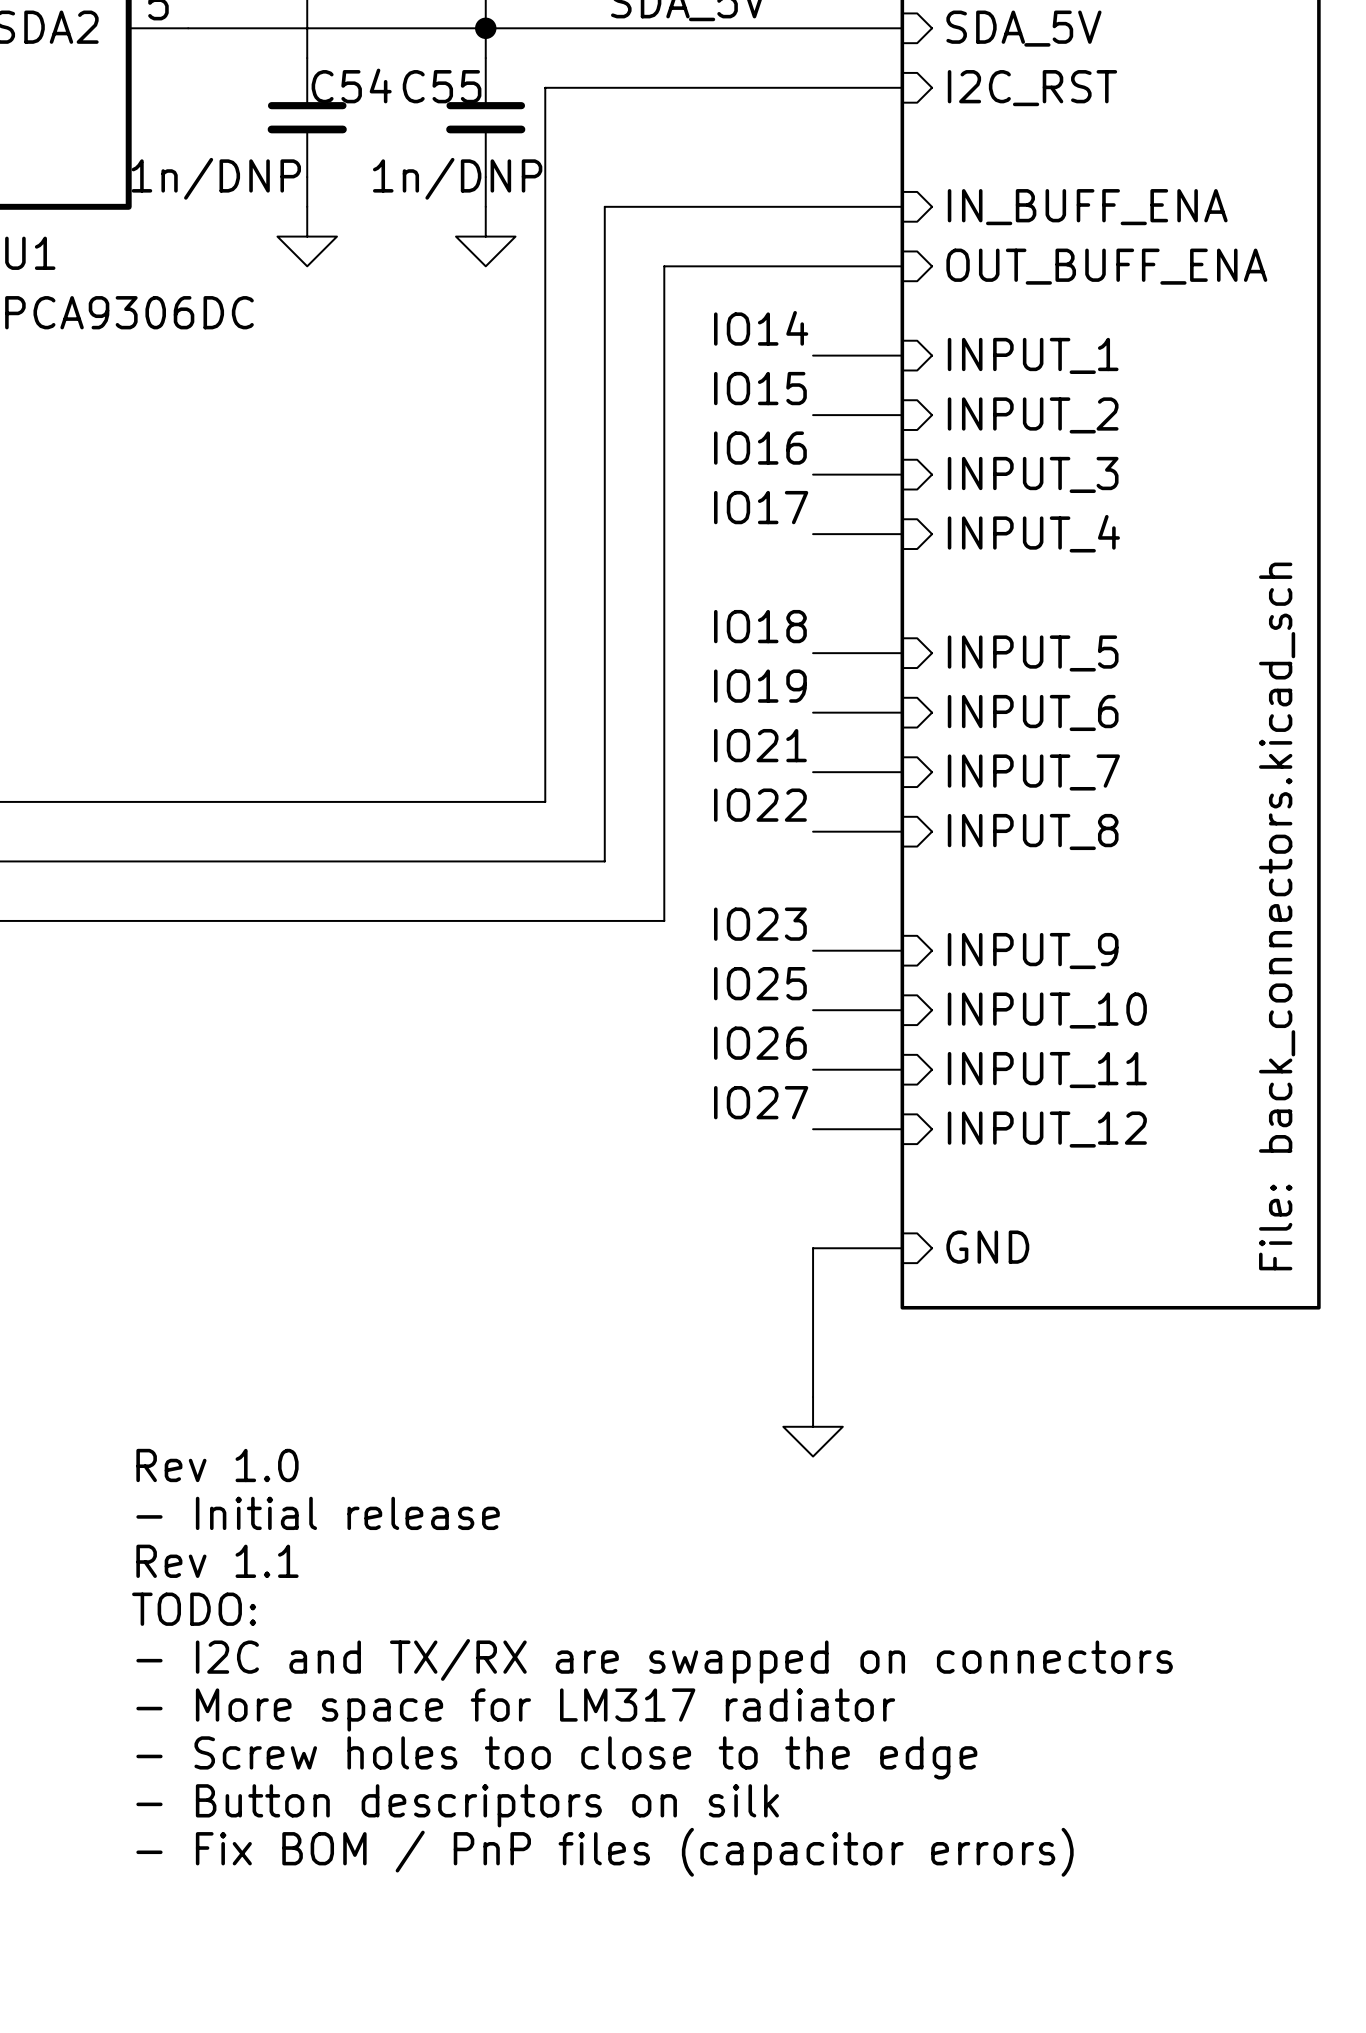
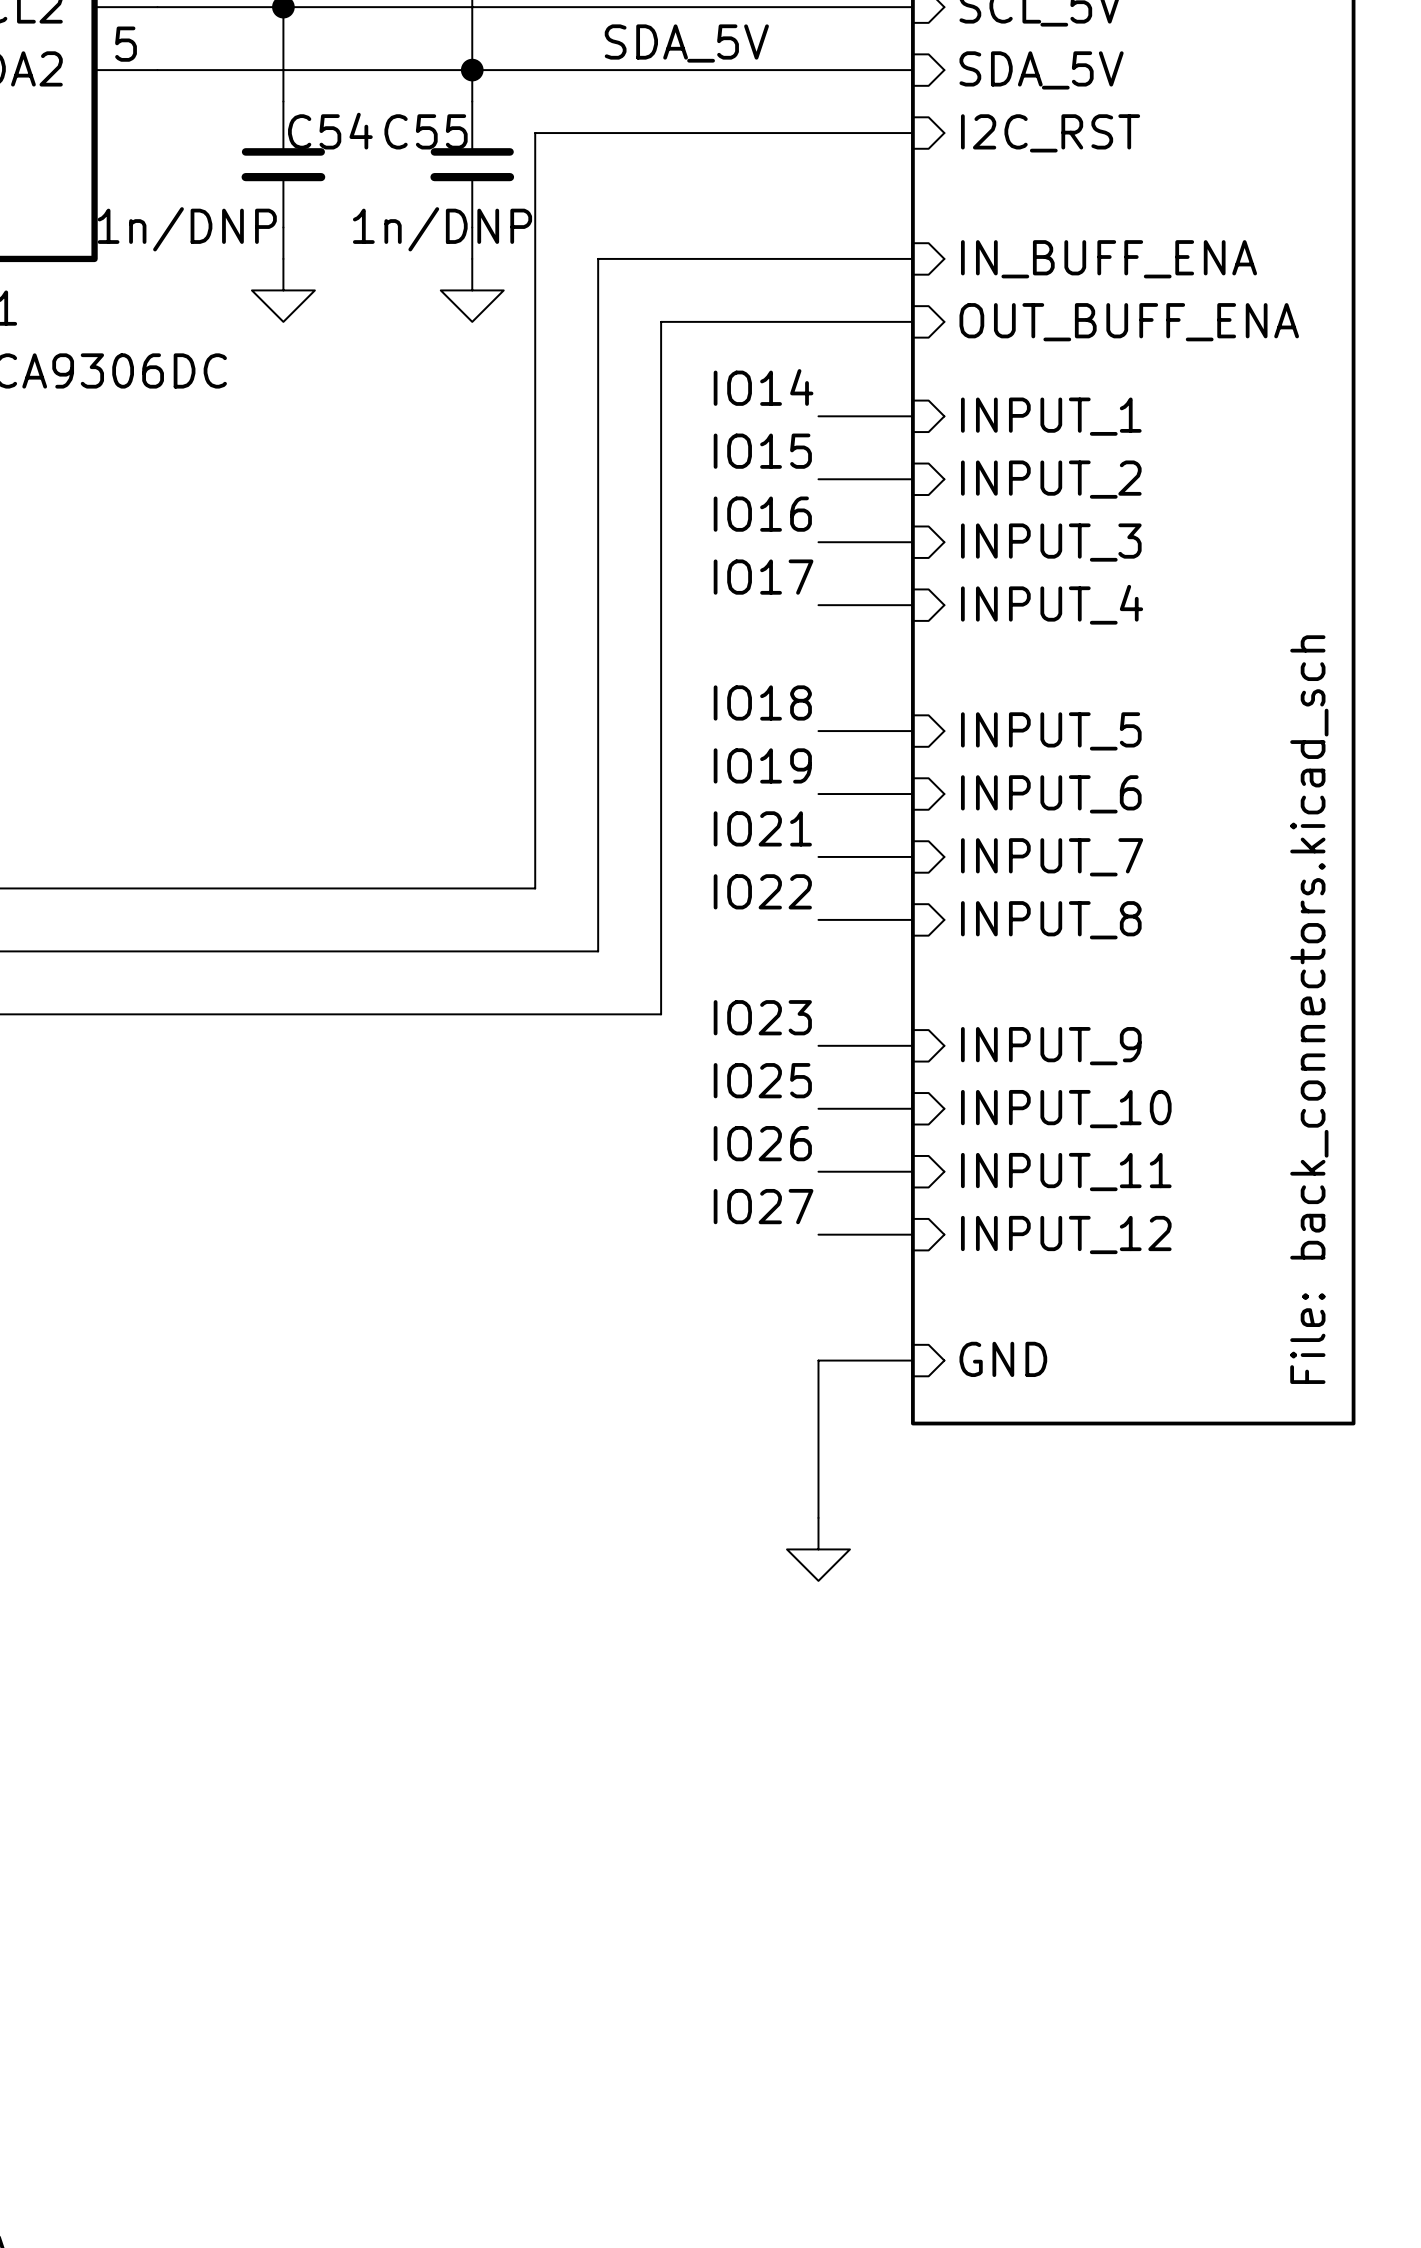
text: Rev 1.0 (217, 1465) -> none
text: - Initial release (318, 1513) -> none
text: Rev 1.1 (217, 1561) -> none
text: TODO: (194, 1609) -> none
text: - I2C and TX/RX are swapped on connectors (654, 1661) -> none
text: - More space for LM317 radiator (515, 1709) -> none
text: - Screw holes too close to the edge (556, 1757) -> none
text: - Button descriptors on silk (457, 1805) -> none
text: - Fix BOM / PnP files (capacitor errors) (605, 1852) -> none

